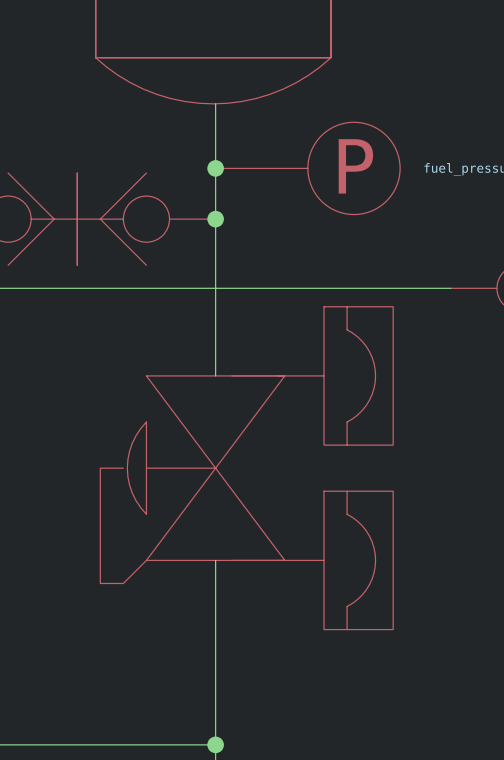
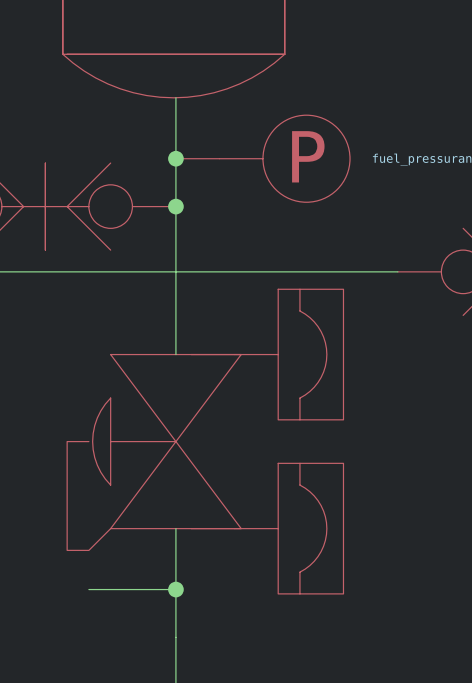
wire: none -> (88, 589) (175, 589)
junction: none -> (175, 589)

